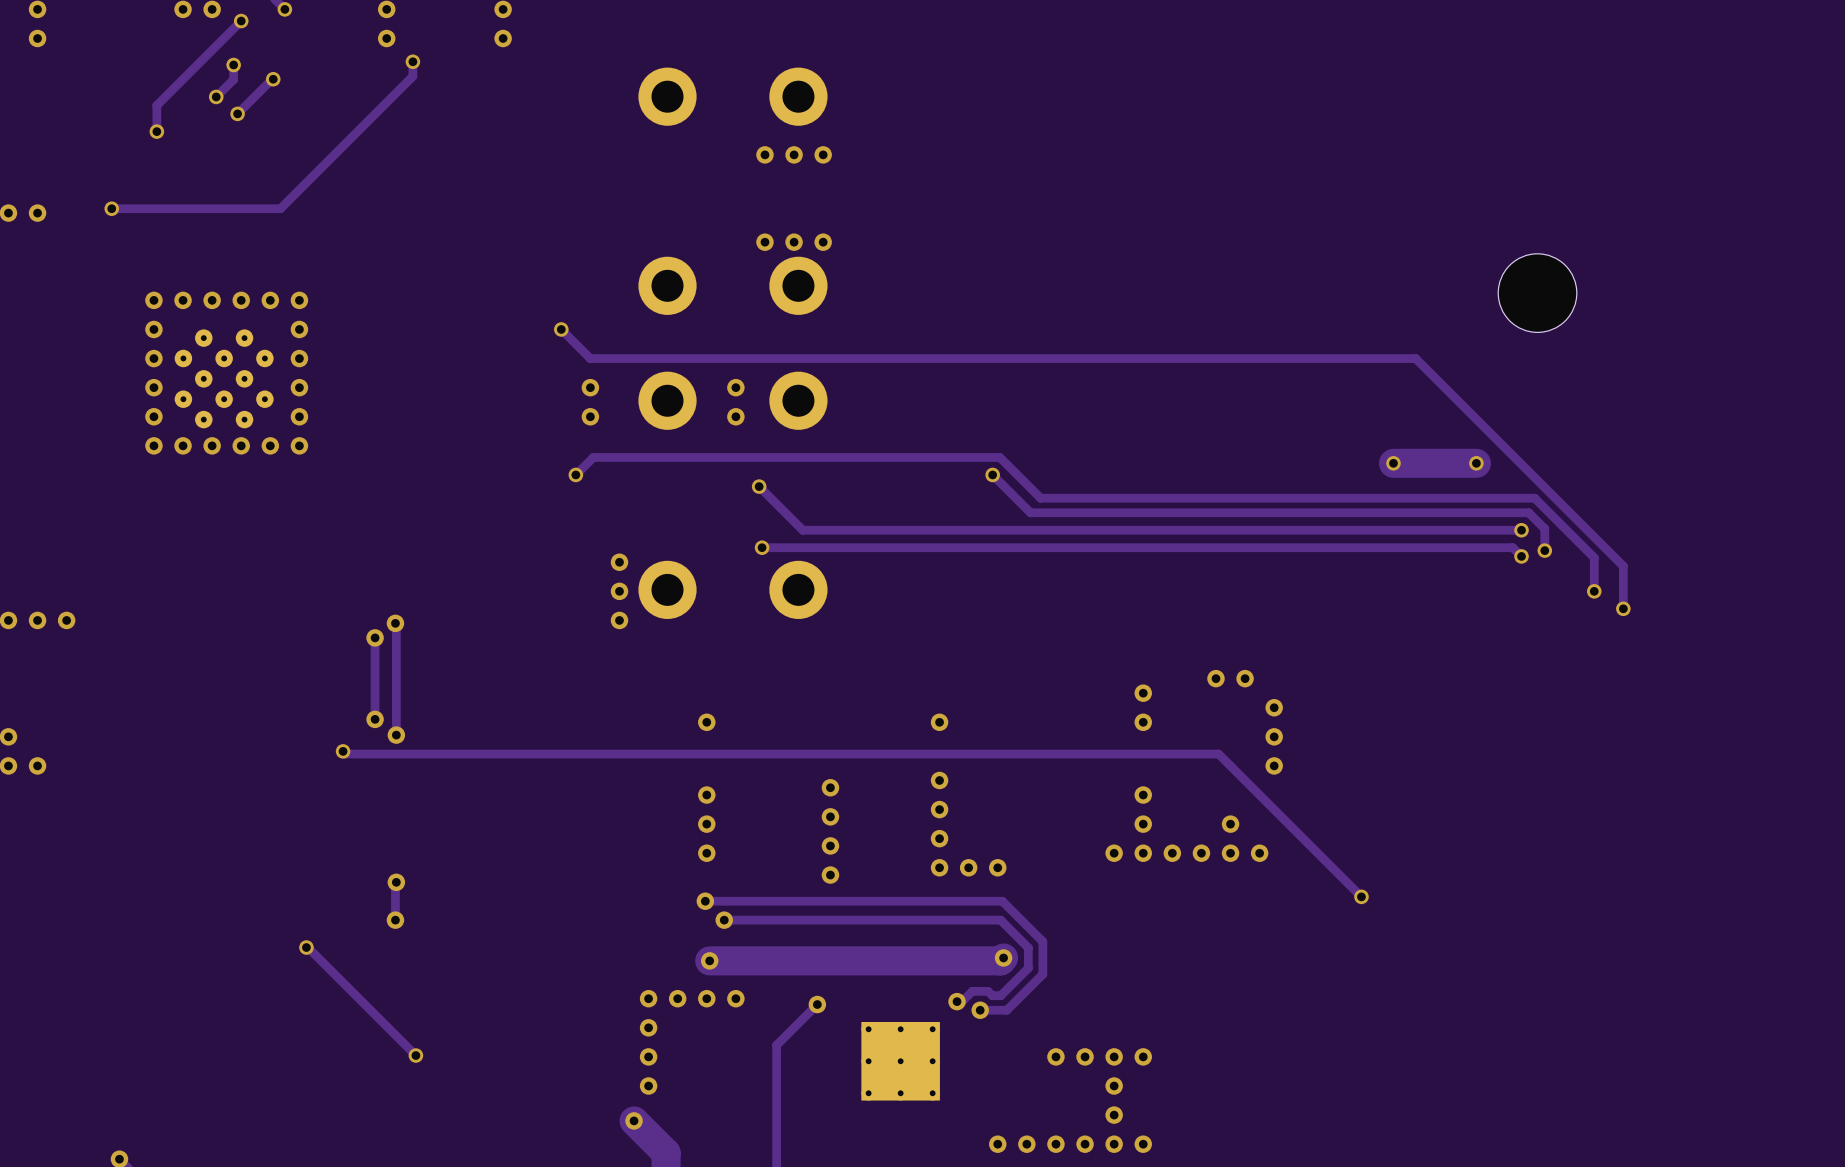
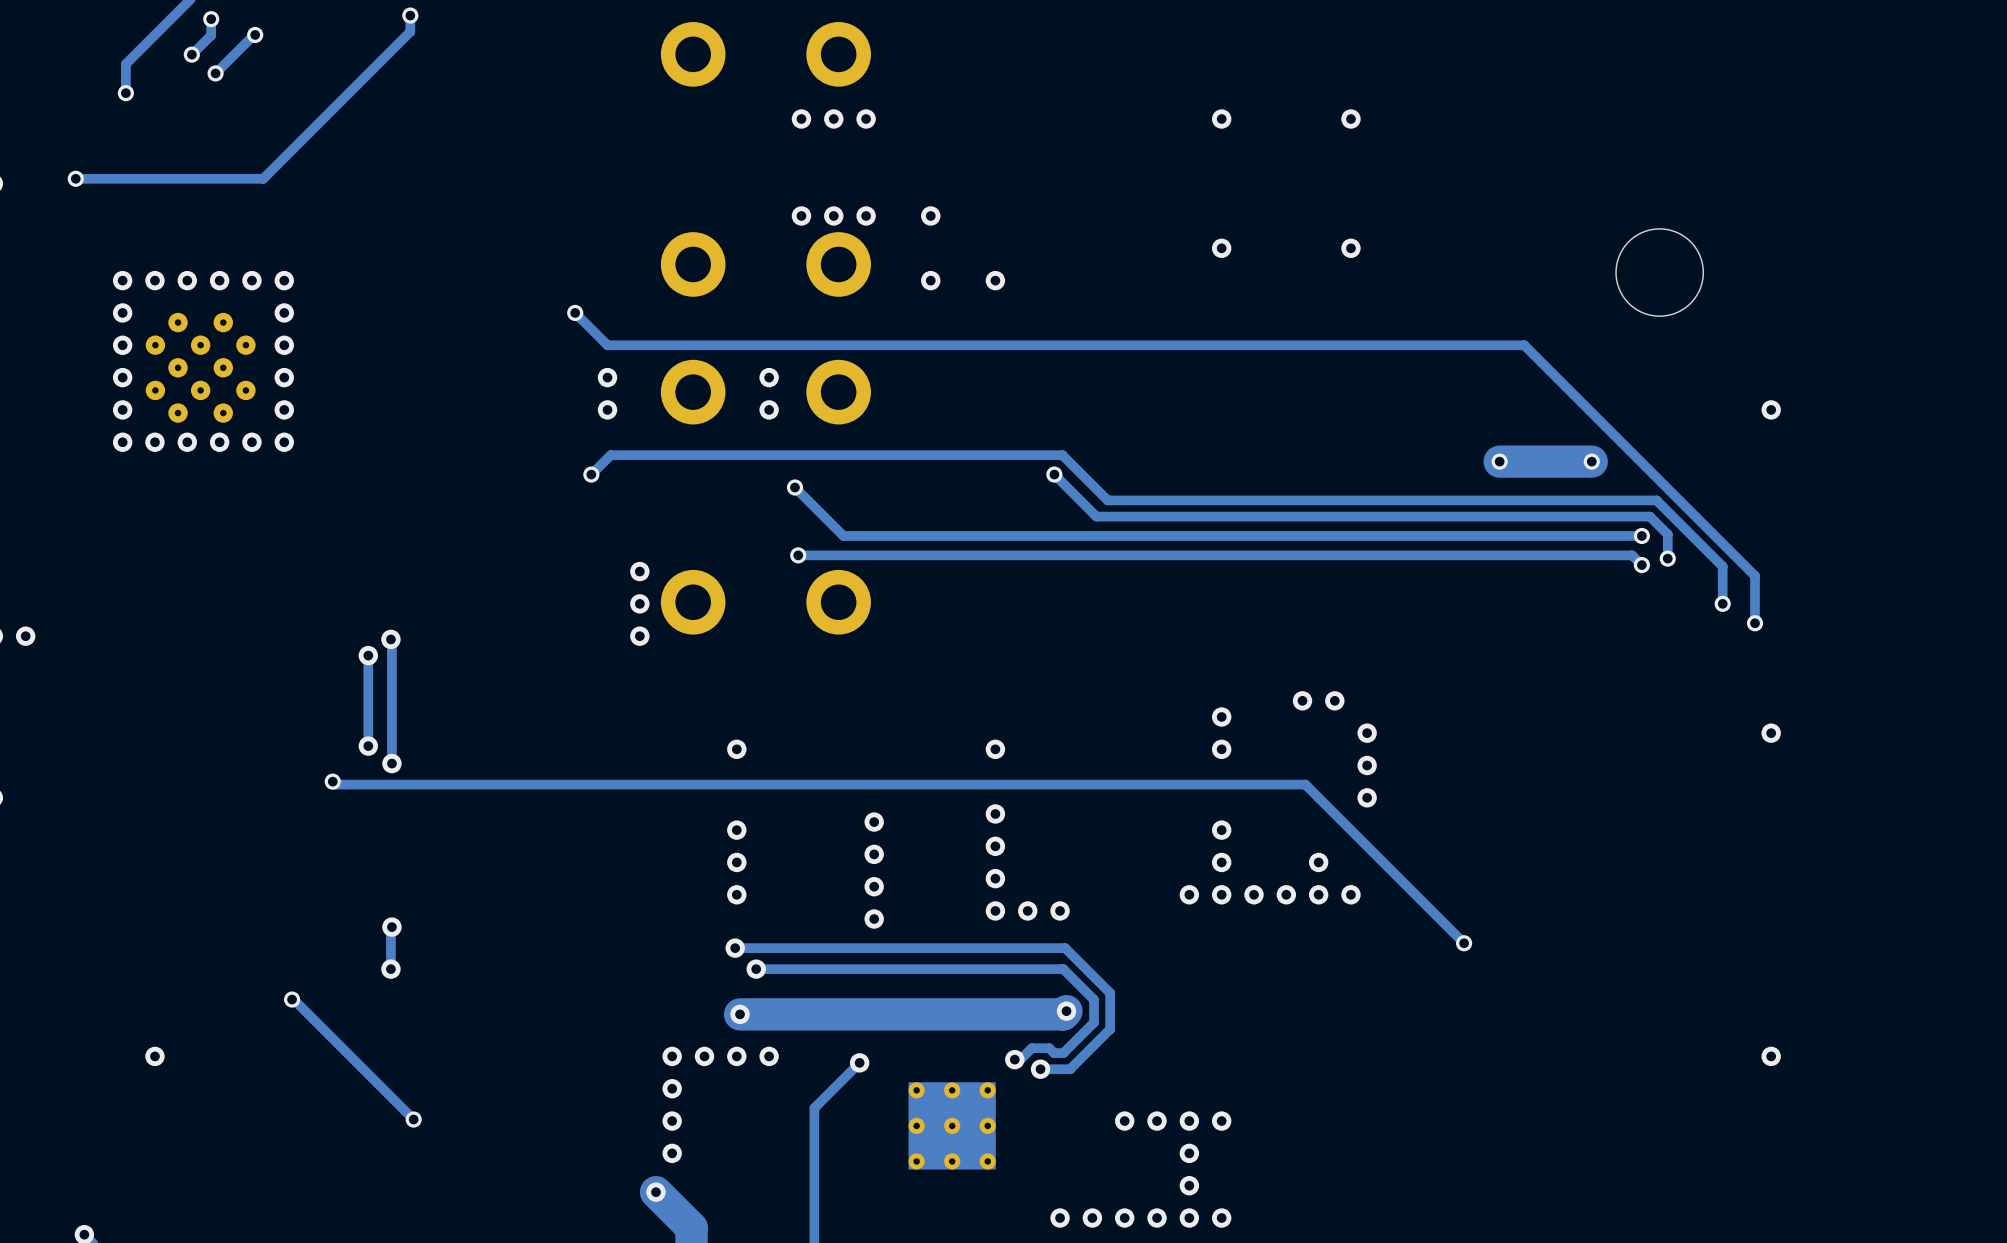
via: none -> (1221, 119)
via: none -> (1350, 119)
via: none -> (930, 215)
via: none -> (1221, 248)
via: none -> (1350, 248)
via: none -> (930, 280)
via: none -> (995, 280)
via: none -> (1771, 409)
via: none -> (1771, 733)
via: none -> (154, 1056)
via: none -> (1771, 1056)

